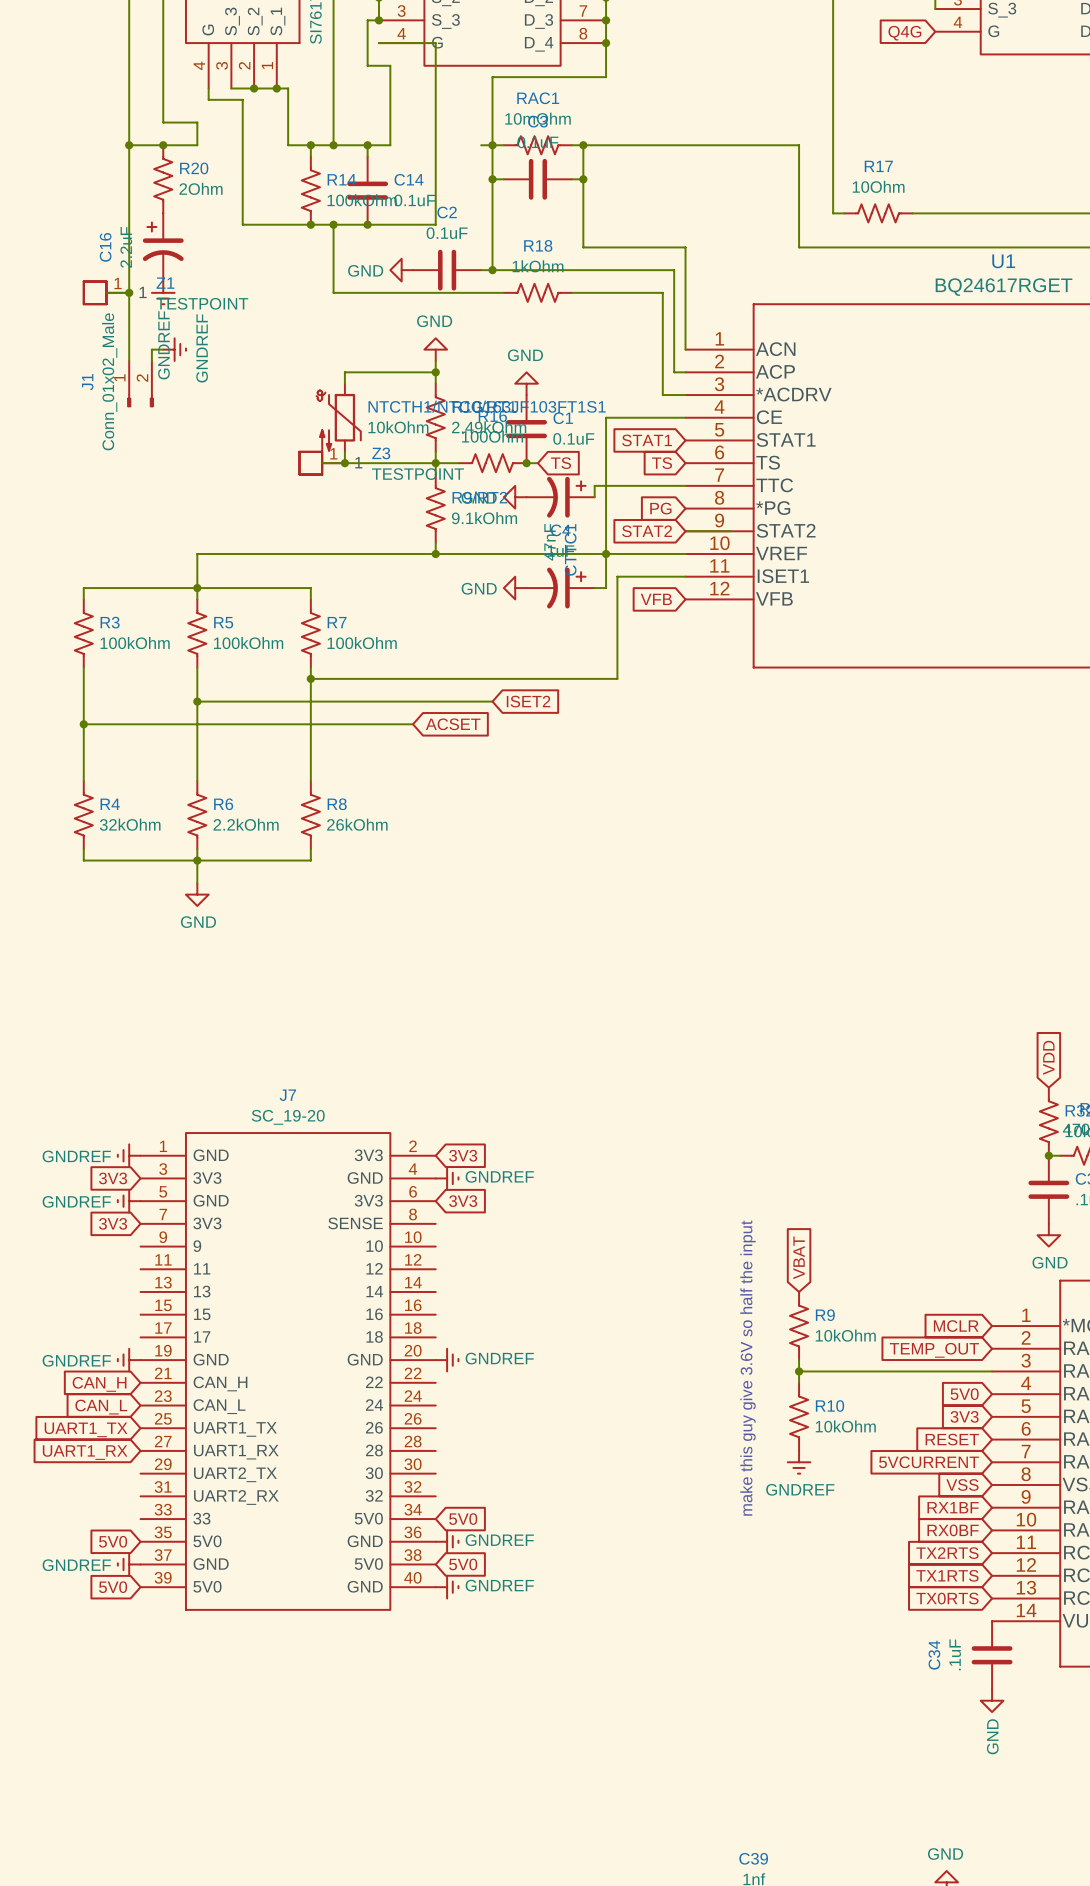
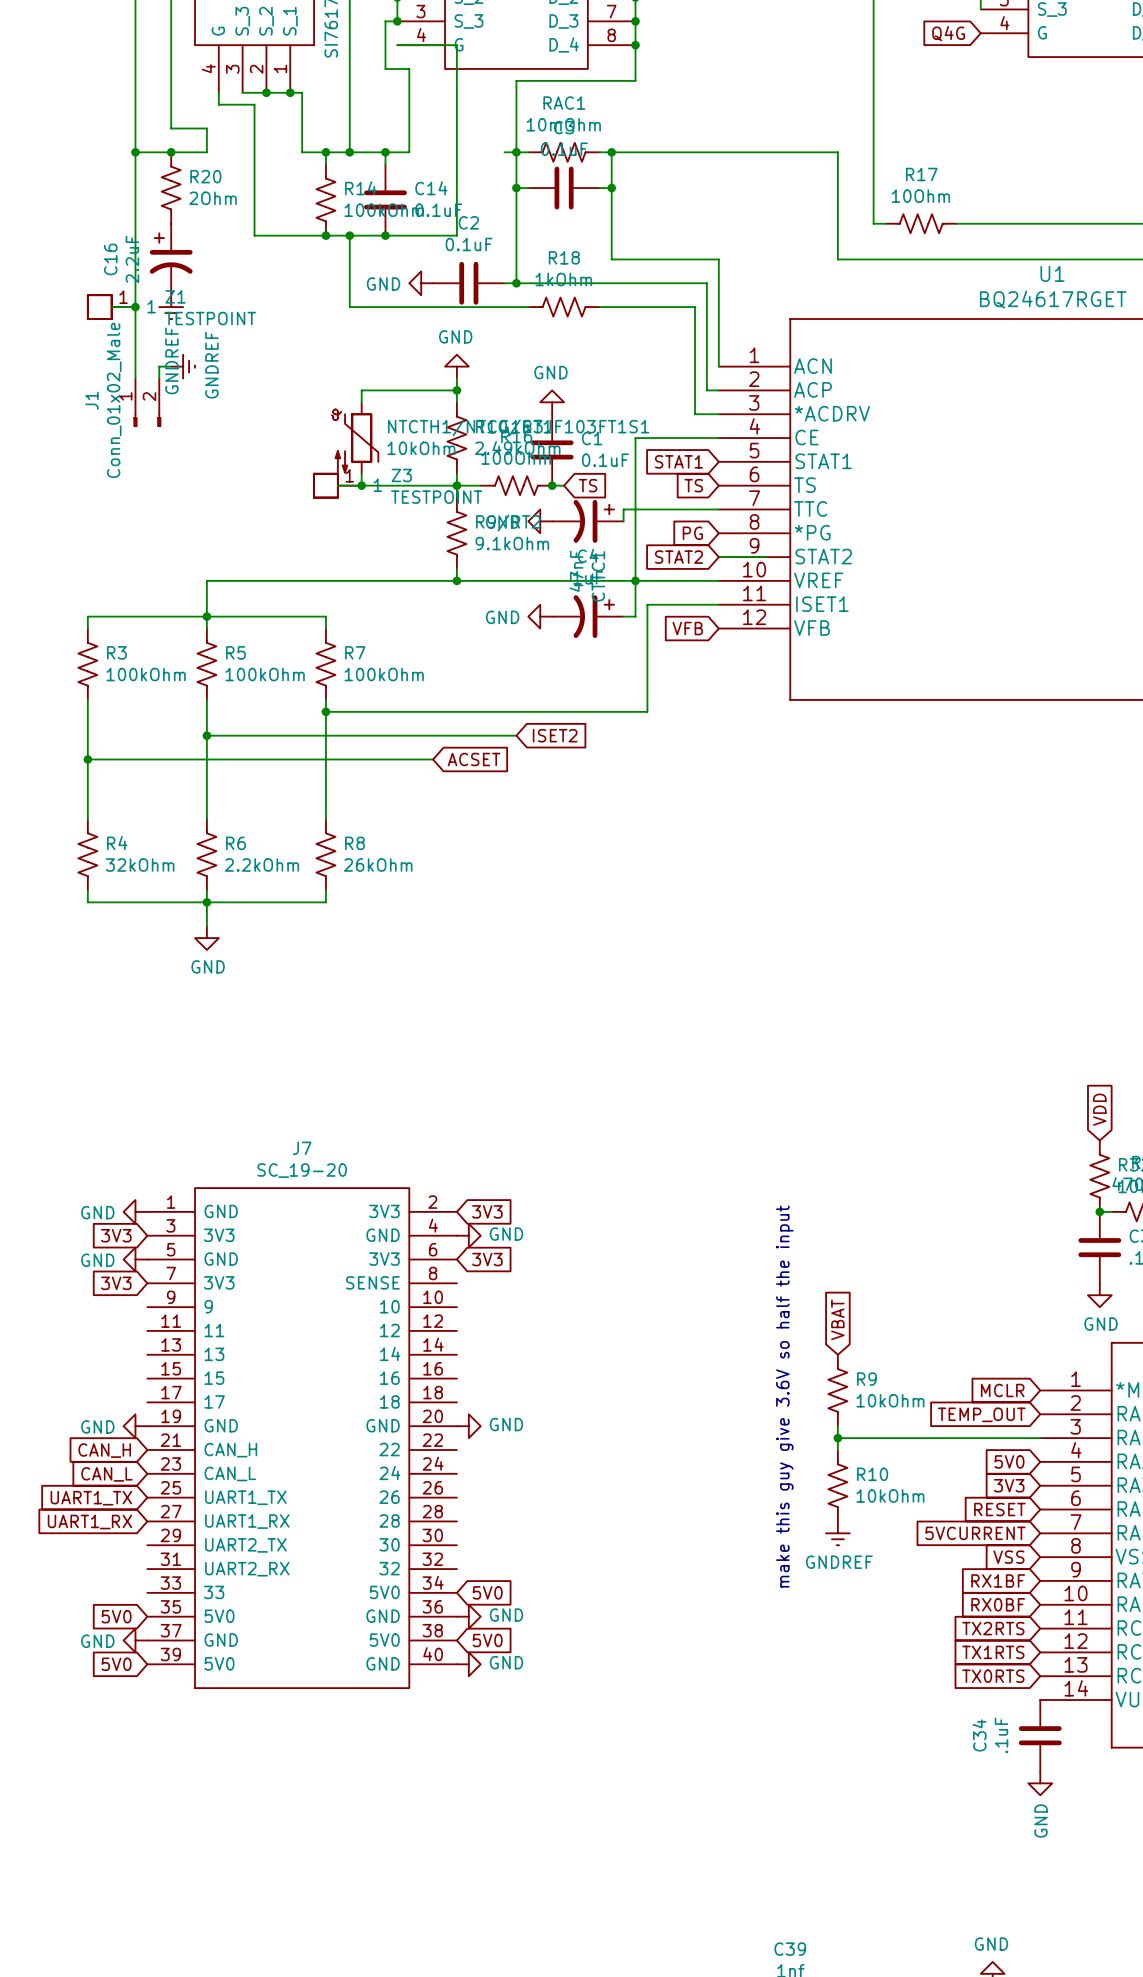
power symbol: GNDREF (129, 1155) -> GND (135, 1211)
power symbol: GNDREF (447, 1178) -> GND (468, 1235)
power symbol: GNDREF (129, 1201) -> GND (135, 1259)
power symbol: GNDREF (129, 1360) -> GND (135, 1426)
power symbol: GNDREF (447, 1360) -> GND (468, 1426)
power symbol: GNDREF (447, 1541) -> GND (468, 1616)
power symbol: GNDREF (129, 1564) -> GND (135, 1640)
power symbol: GNDREF (447, 1587) -> GND (468, 1664)

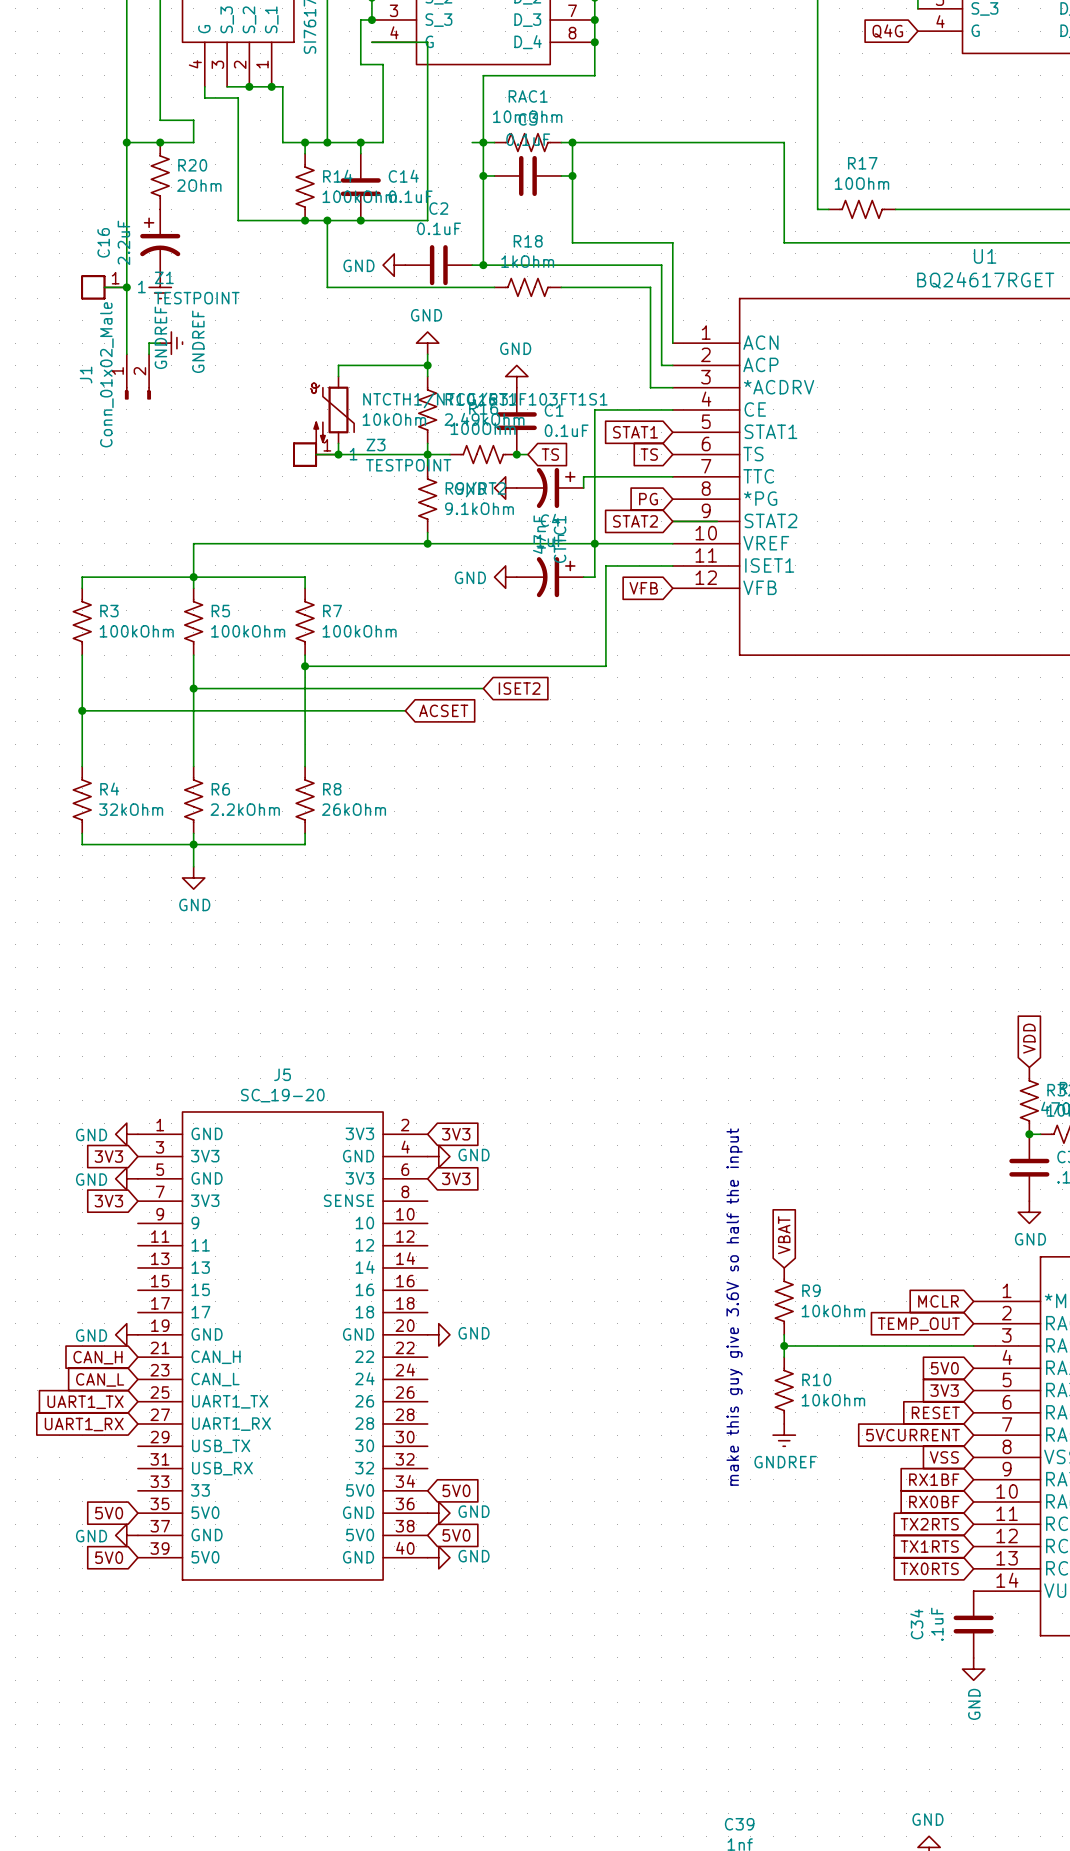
J7 name: J7 (302, 1148) -> J5 (282, 1074)
J7 pin name: UART2_TX (245, 1545) -> USB_TX (221, 1446)
J7 pin name: UART2_RX (247, 1569) -> USB_RX (222, 1468)

